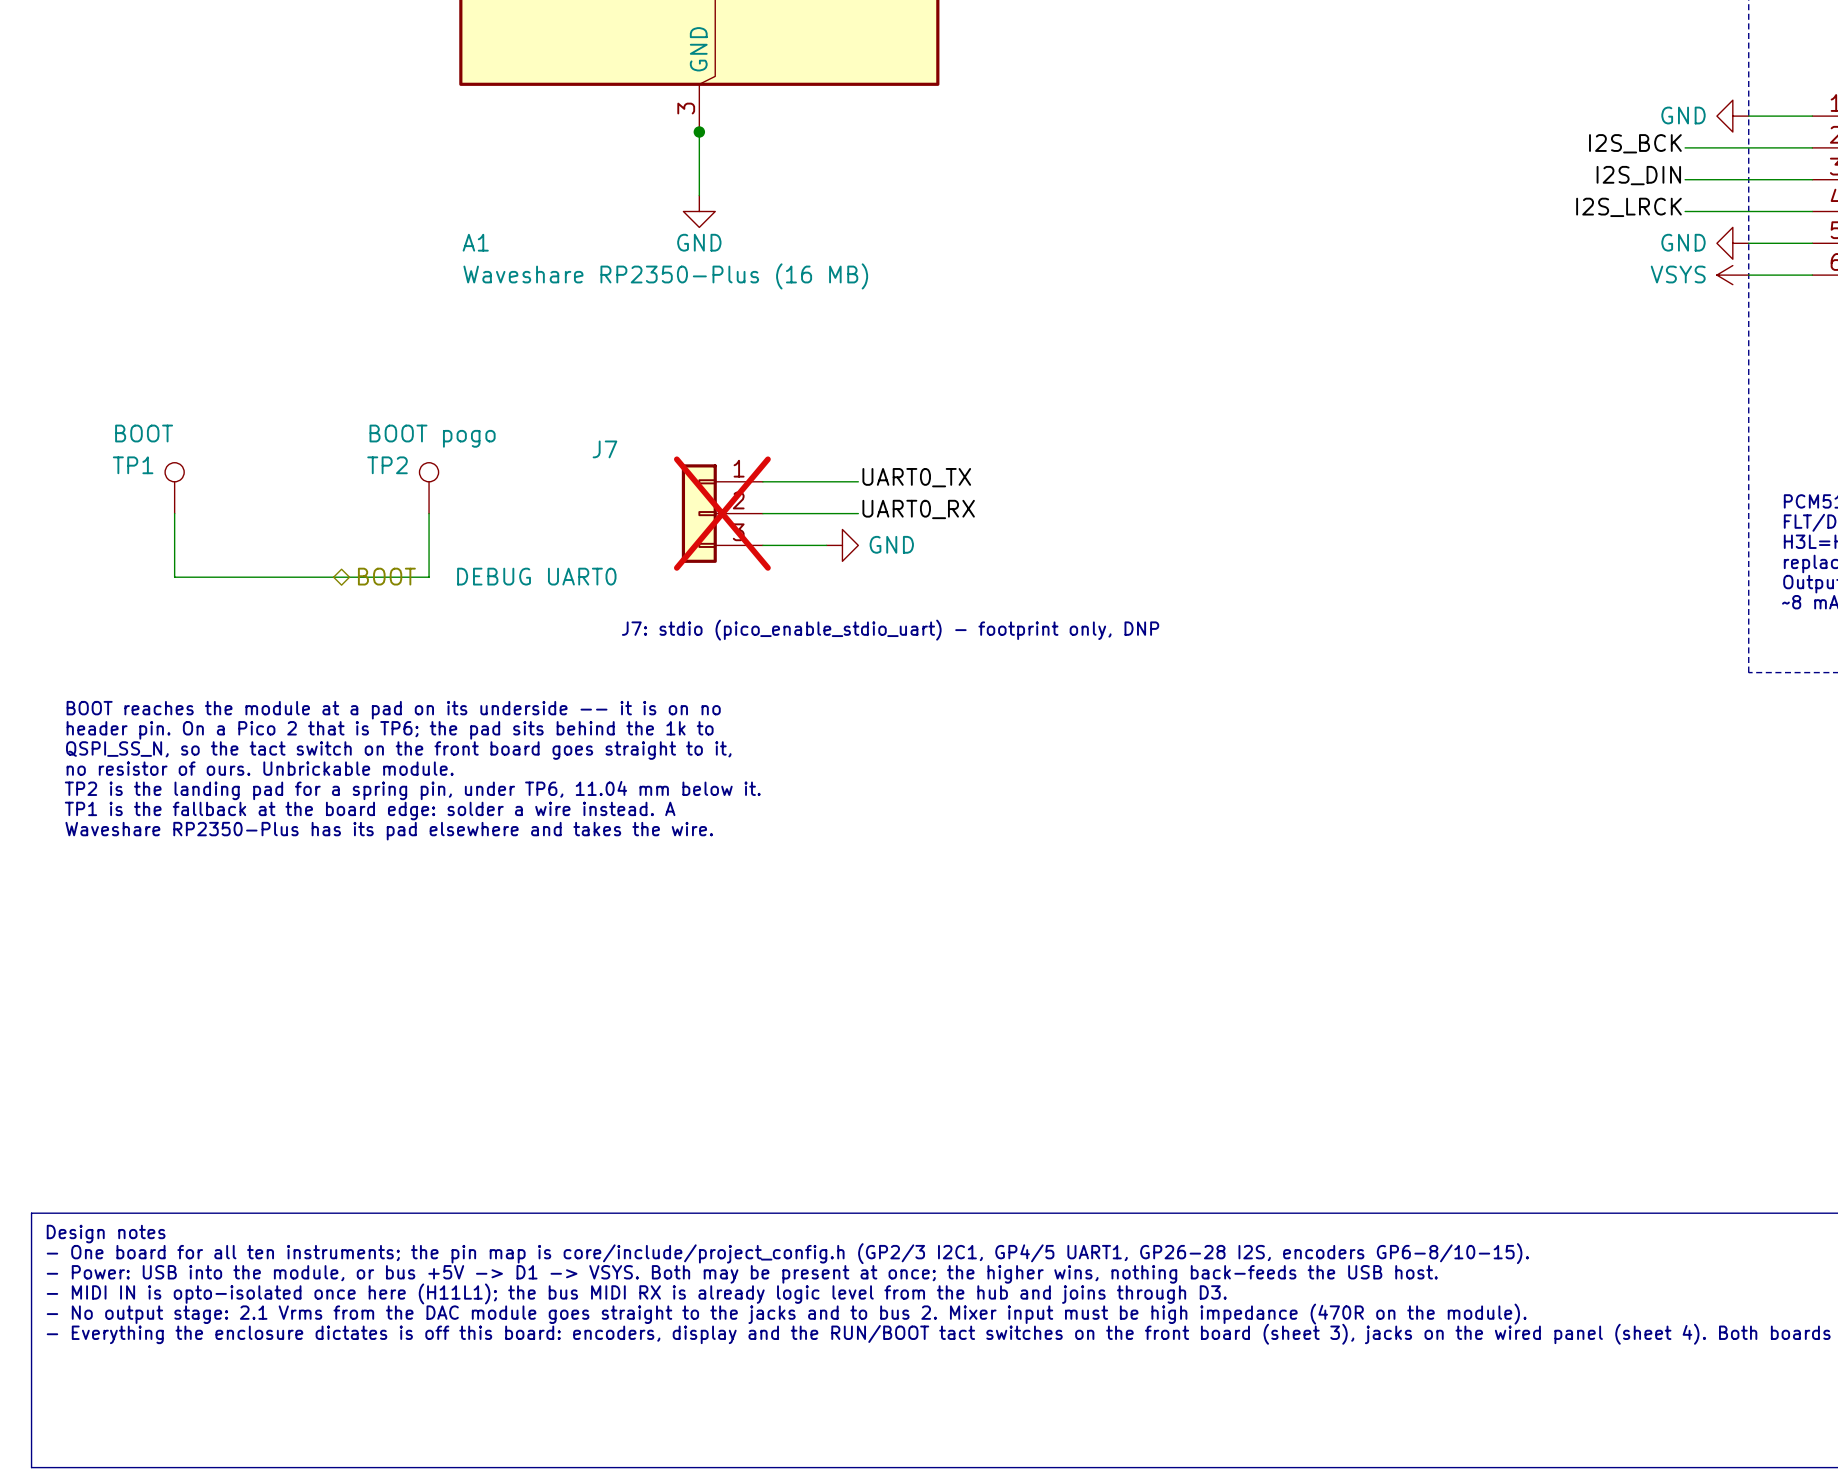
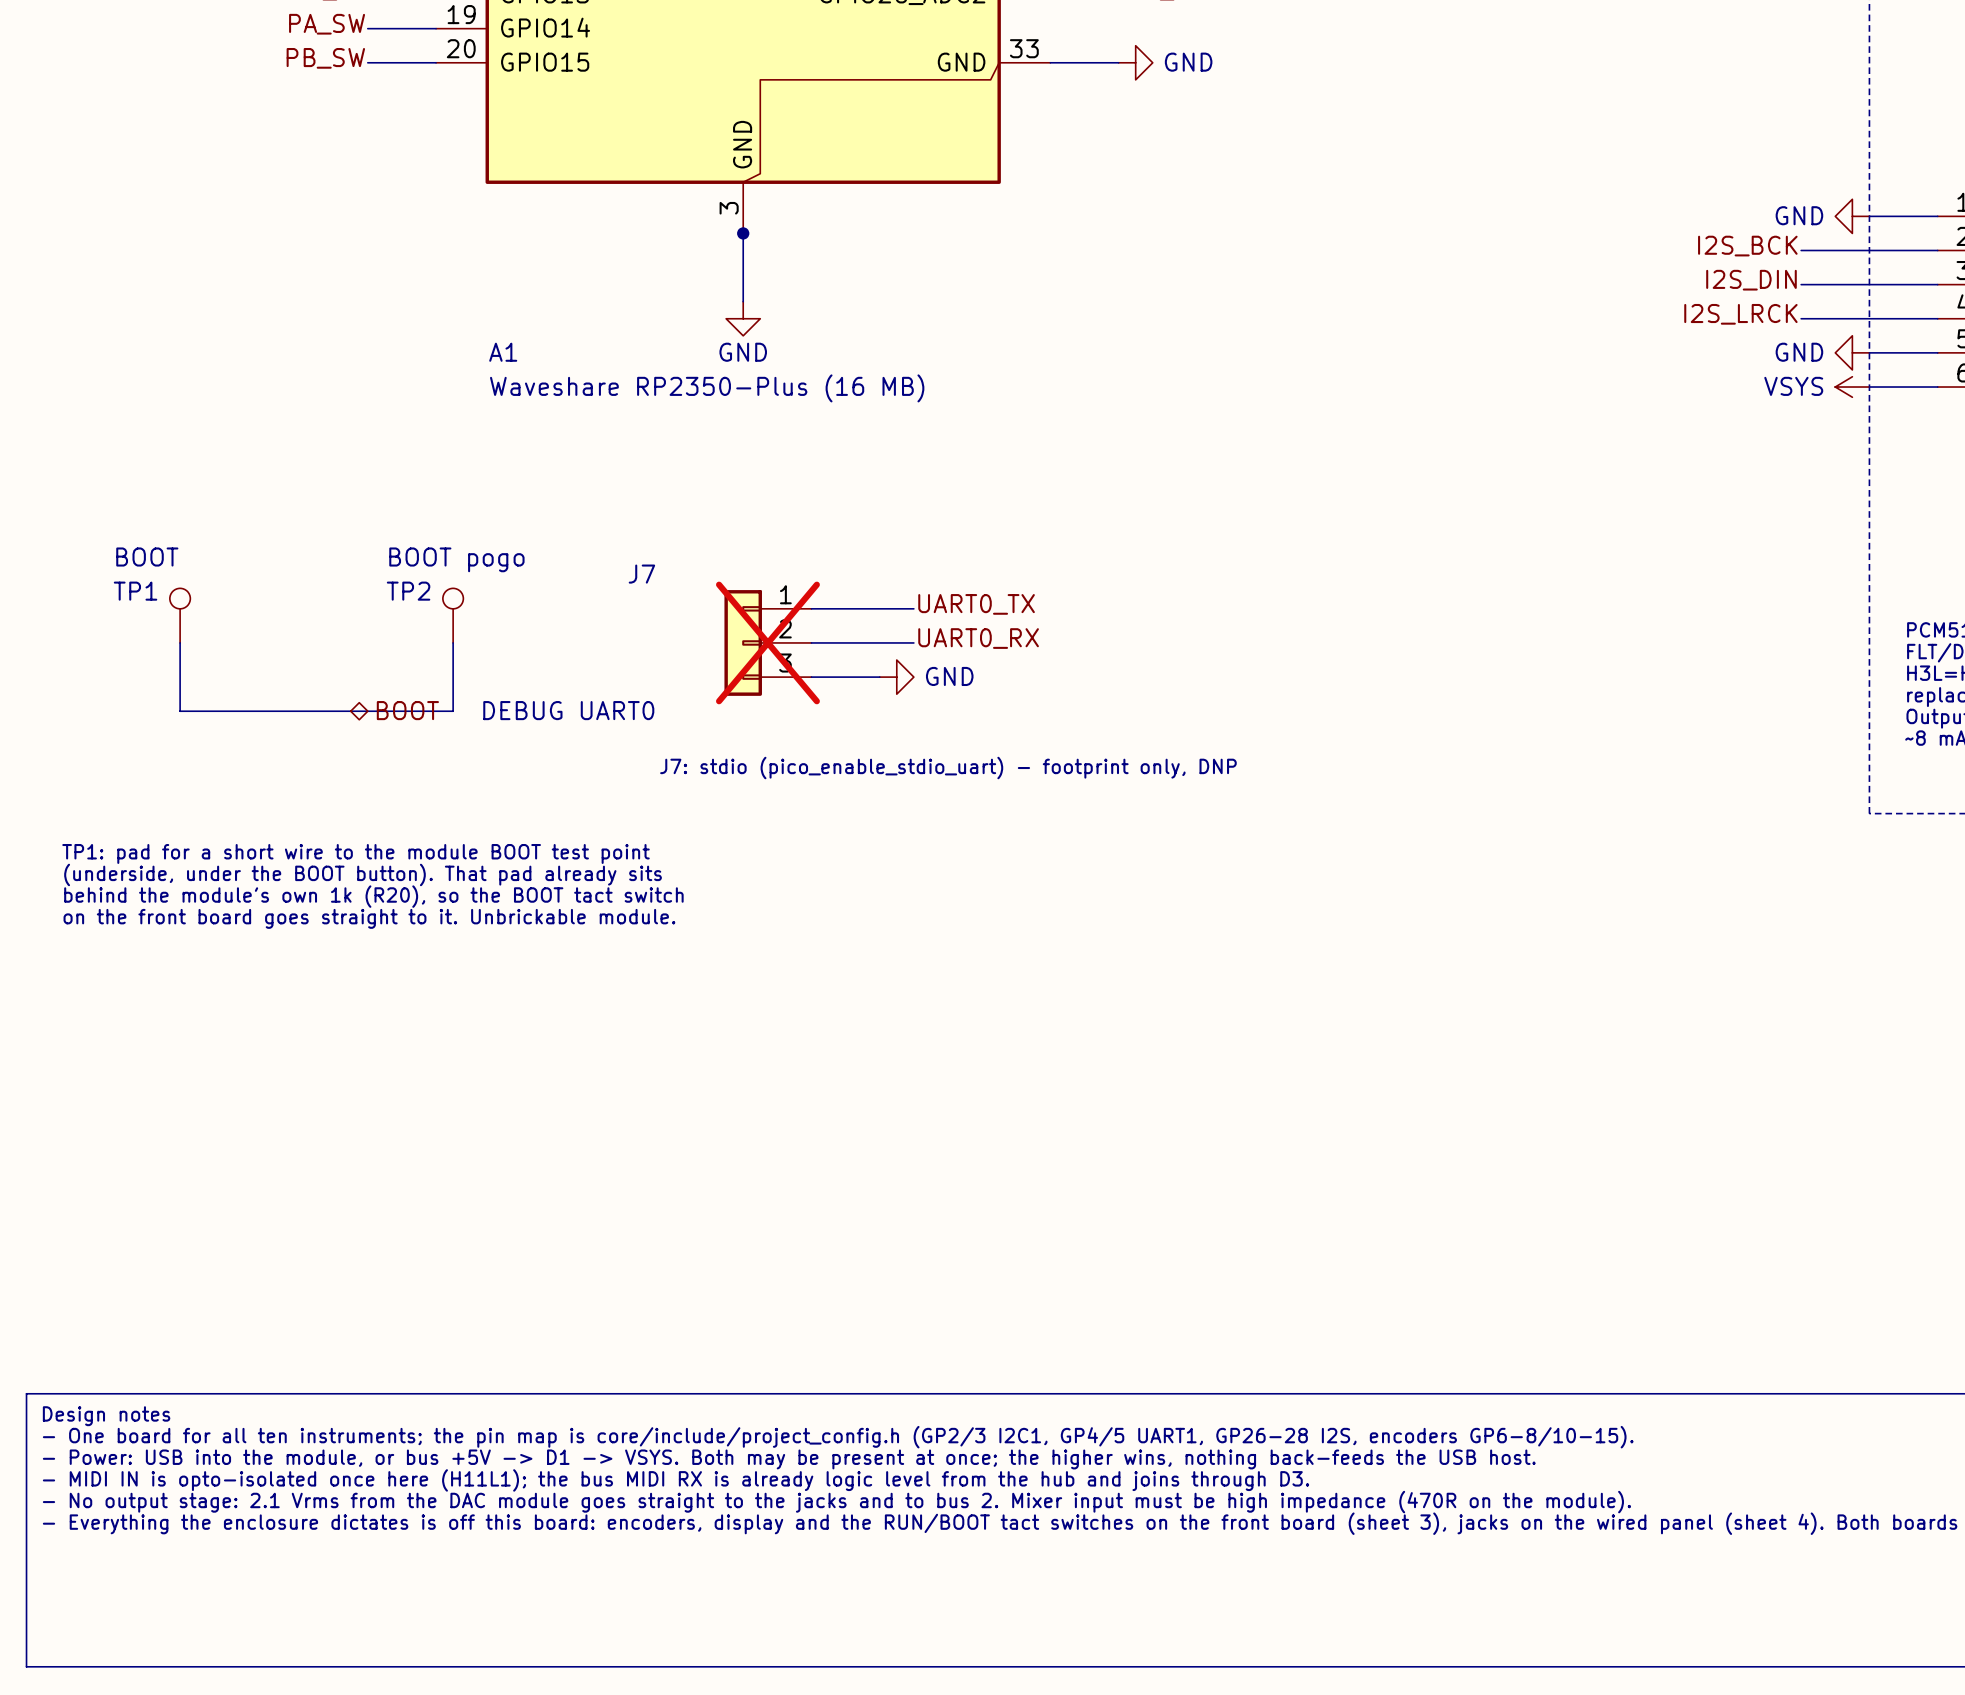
text: BOOT reaches the module at a pad on its underside -- it is on no (393, 710) -> TP1: pad for a short wire to the module BOOT test point (355, 853)
text: header pin. On a Pico 2 that is TP6; the pad sits behind the 1k to (390, 730) -> (underside, under the BOOT button). That pad already sits (363, 874)
text: QSPI_SS_N, so the tact switch on the front board goes straight to it, (398, 750) -> behind the module's own 1k (R20), so the BOOT tact switch (373, 896)
text: no resistor of ours. Unbrickable module. (260, 768) -> on the front board goes straight to it. Unbrickable module. (369, 918)
text: TP2 is the landing pad for a spring pin, under TP6, 11.04 mm below it. (412, 790) -> none
text: TP1 is the fallback at the board edge: solder a wire instead. A (370, 810) -> none
text: Waveshare RP2350-Plus has its pad elsewhere and takes the wire. (389, 831) -> none

